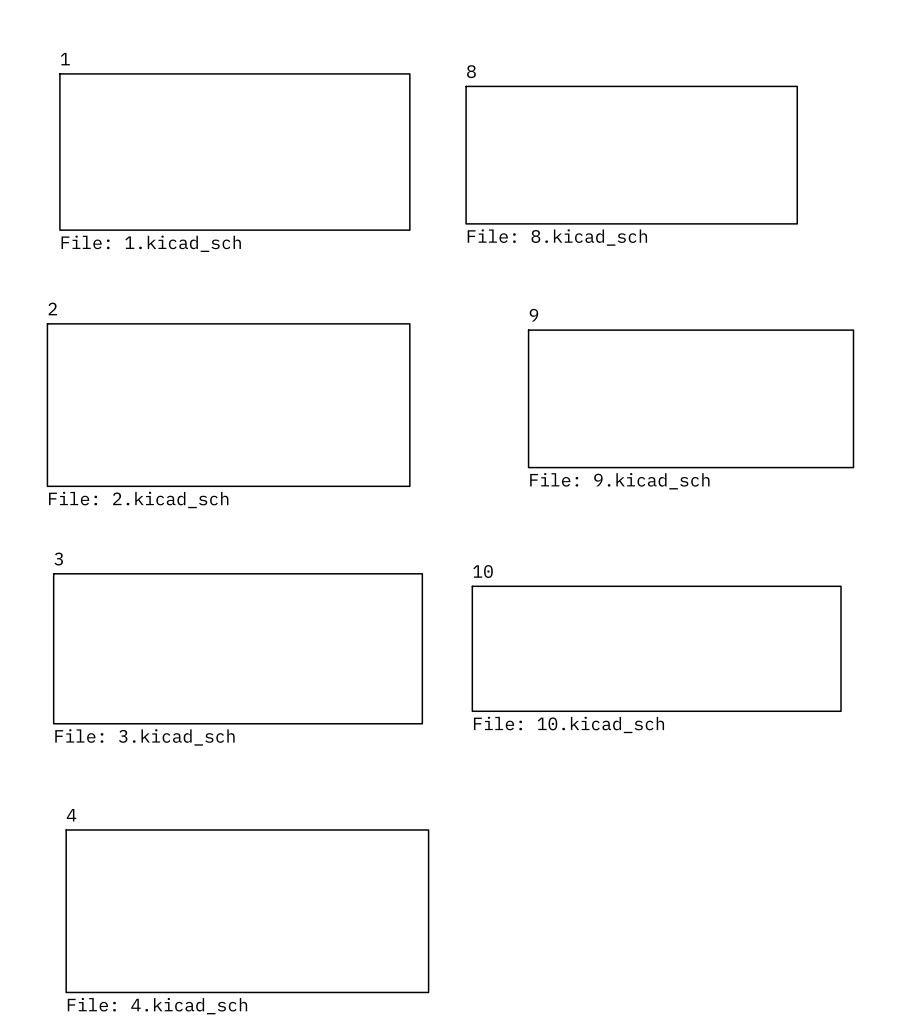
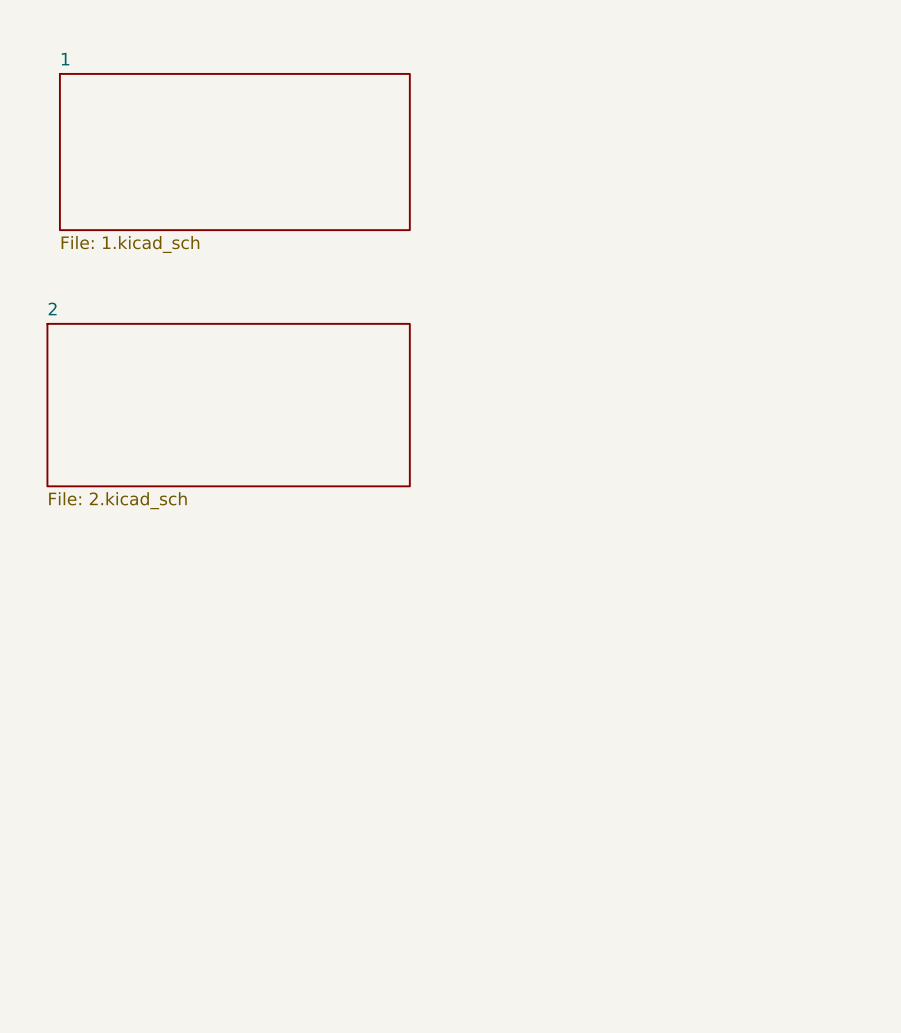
sheet 8: File: 8.kicad_sch (631, 155) -> none
sheet 9: File: 9.kicad_sch (691, 398) -> none
sheet 3: File: 3.kicad_sch (238, 648) -> none
sheet 10: File: 10.kicad_sch (656, 648) -> none
sheet 4: File: 4.kicad_sch (247, 911) -> none

